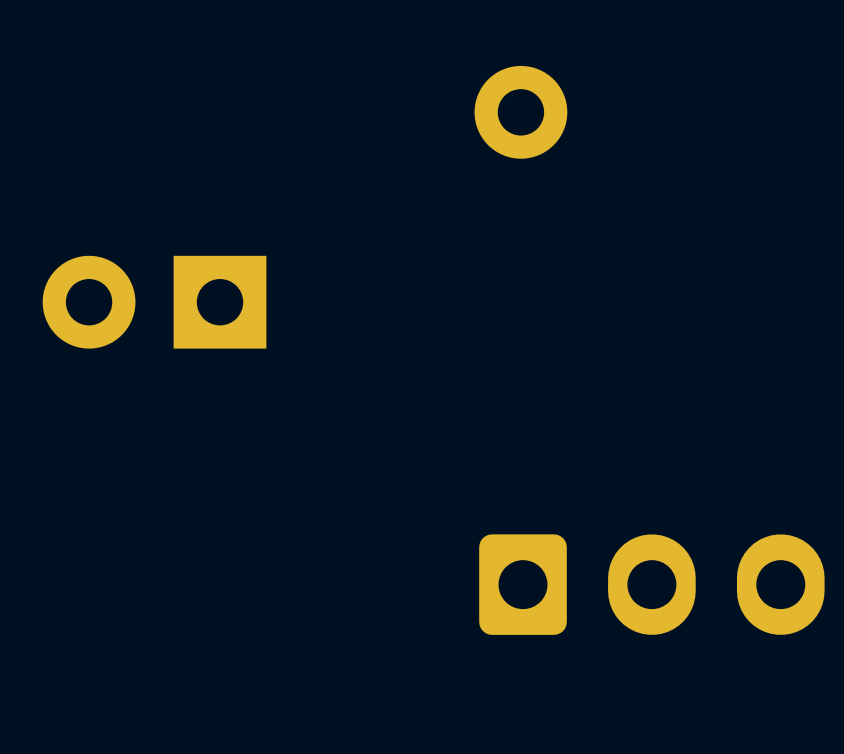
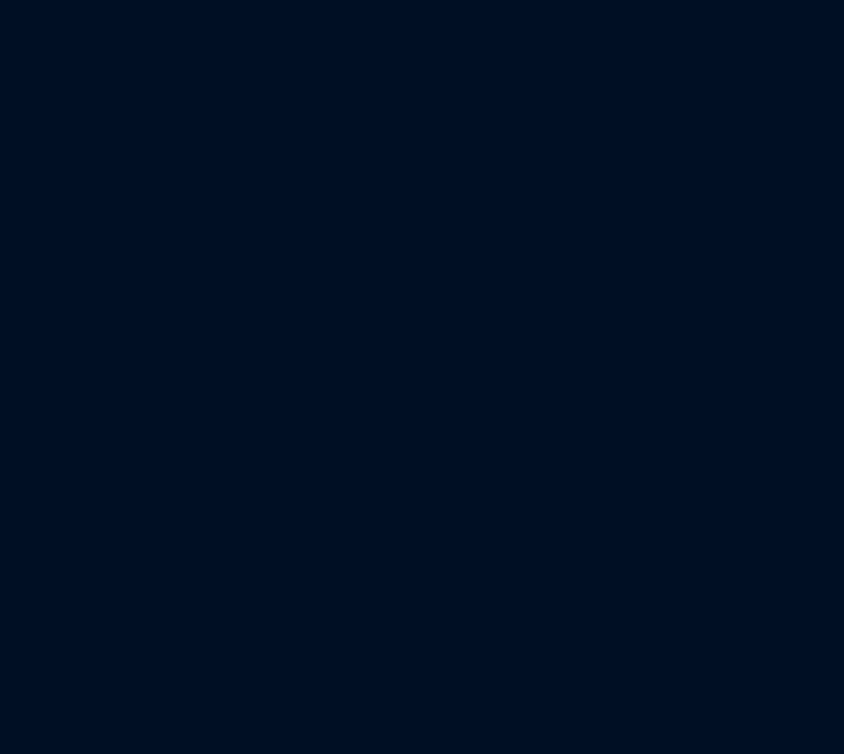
part: (520, 112) -> none
part: (154, 302) -> none
part: (651, 584) -> none

